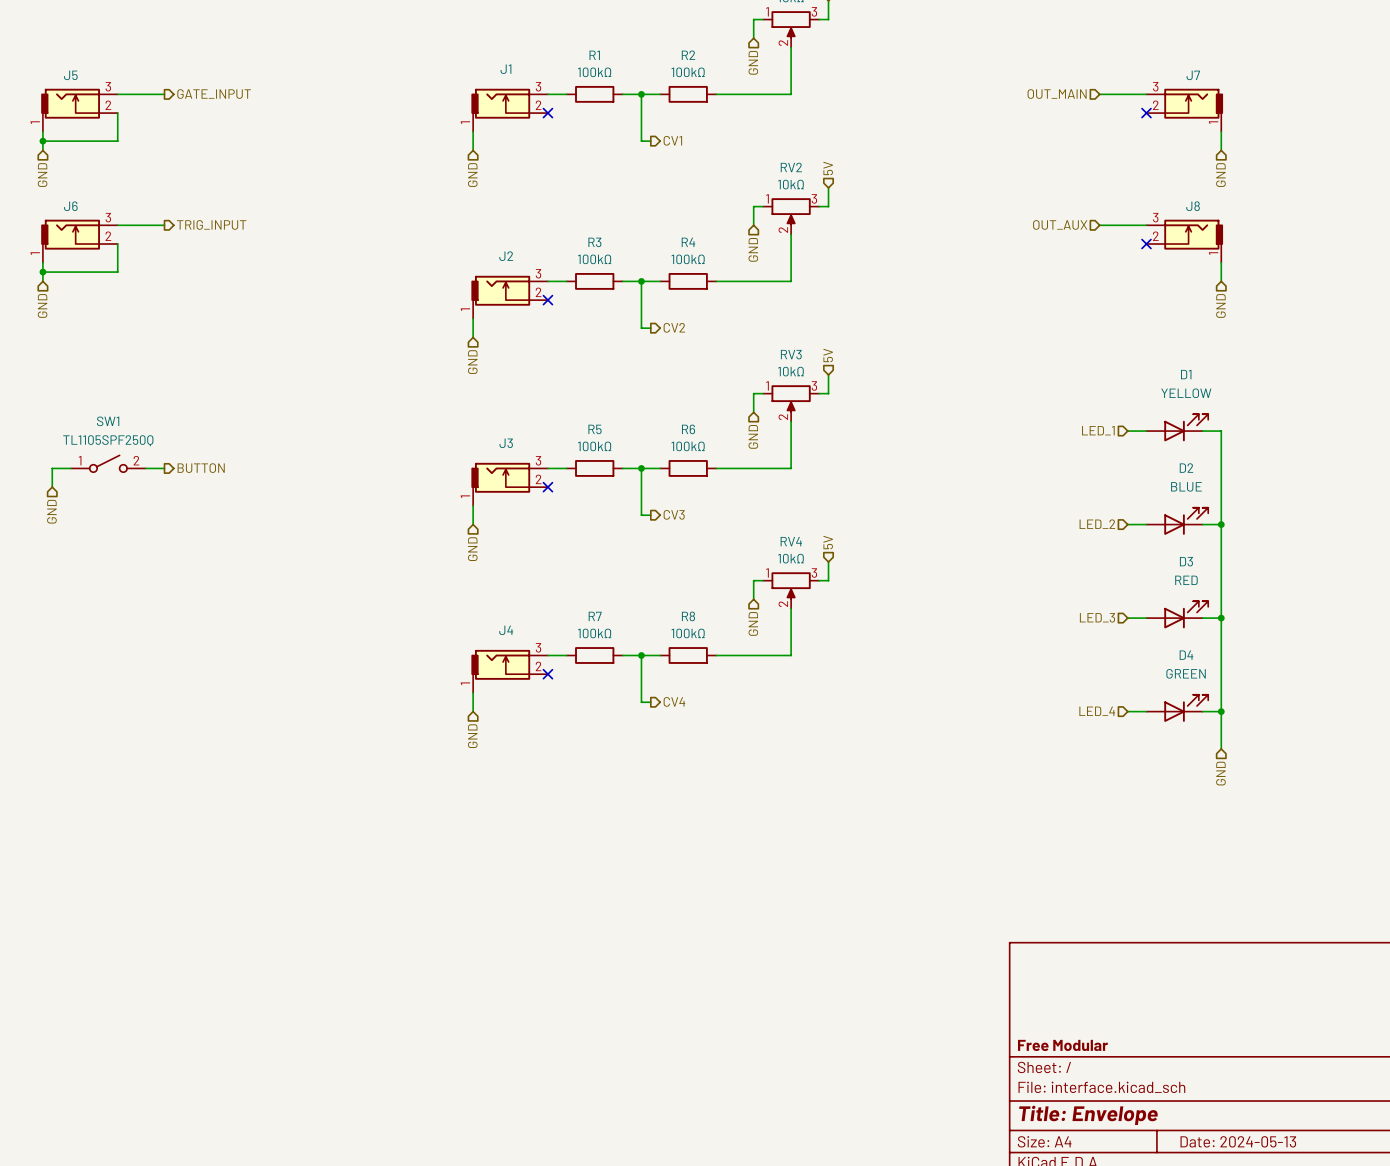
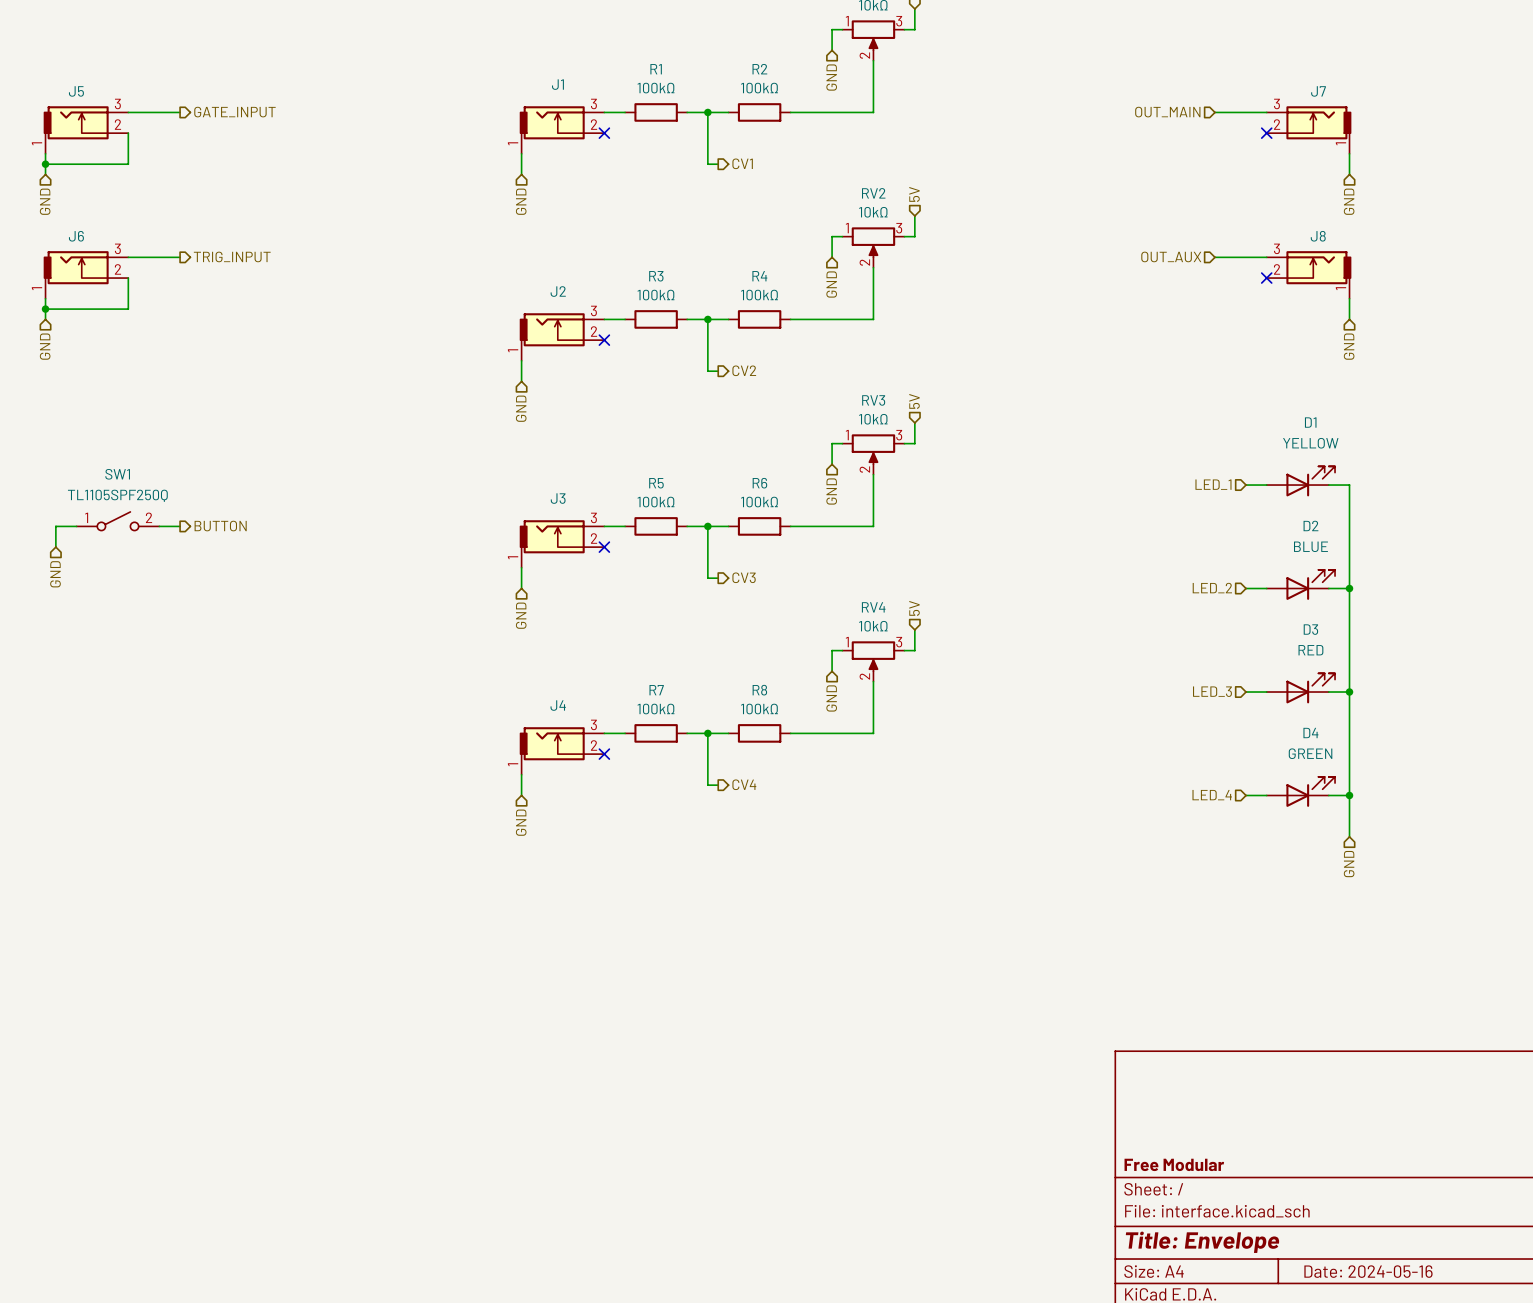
title block: Date: 2024-05-13 (1238, 1141) -> Date: 2024-05-16 (1368, 1271)

